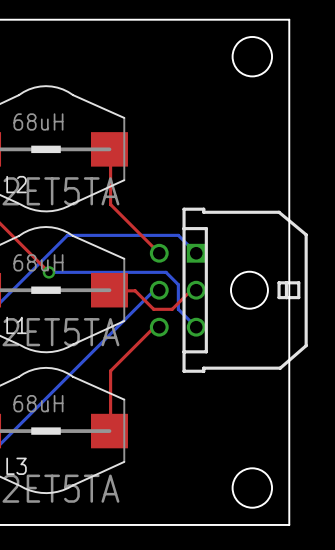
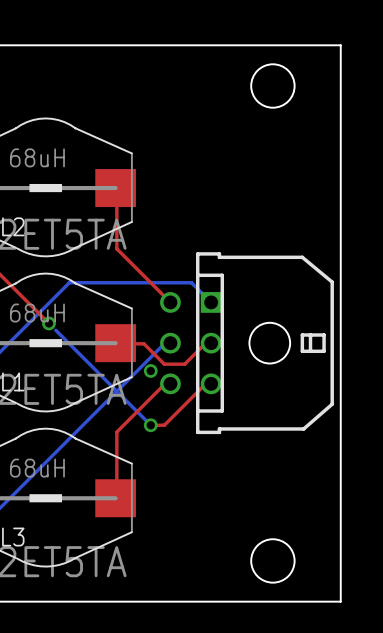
board edge: (289, 19) (289, 524) -> (313, 45) (340, 45) (340, 601) (313, 601)
bottom track: (48, 272) (166, 272) (178, 284) (178, 309) (196, 327) -> none
bottom track: none -> (55, 330) (150, 425)
via: none -> (150, 370)
top track: none -> (211, 383) (205, 384) (164, 425) (150, 425)
via: none -> (150, 425)

